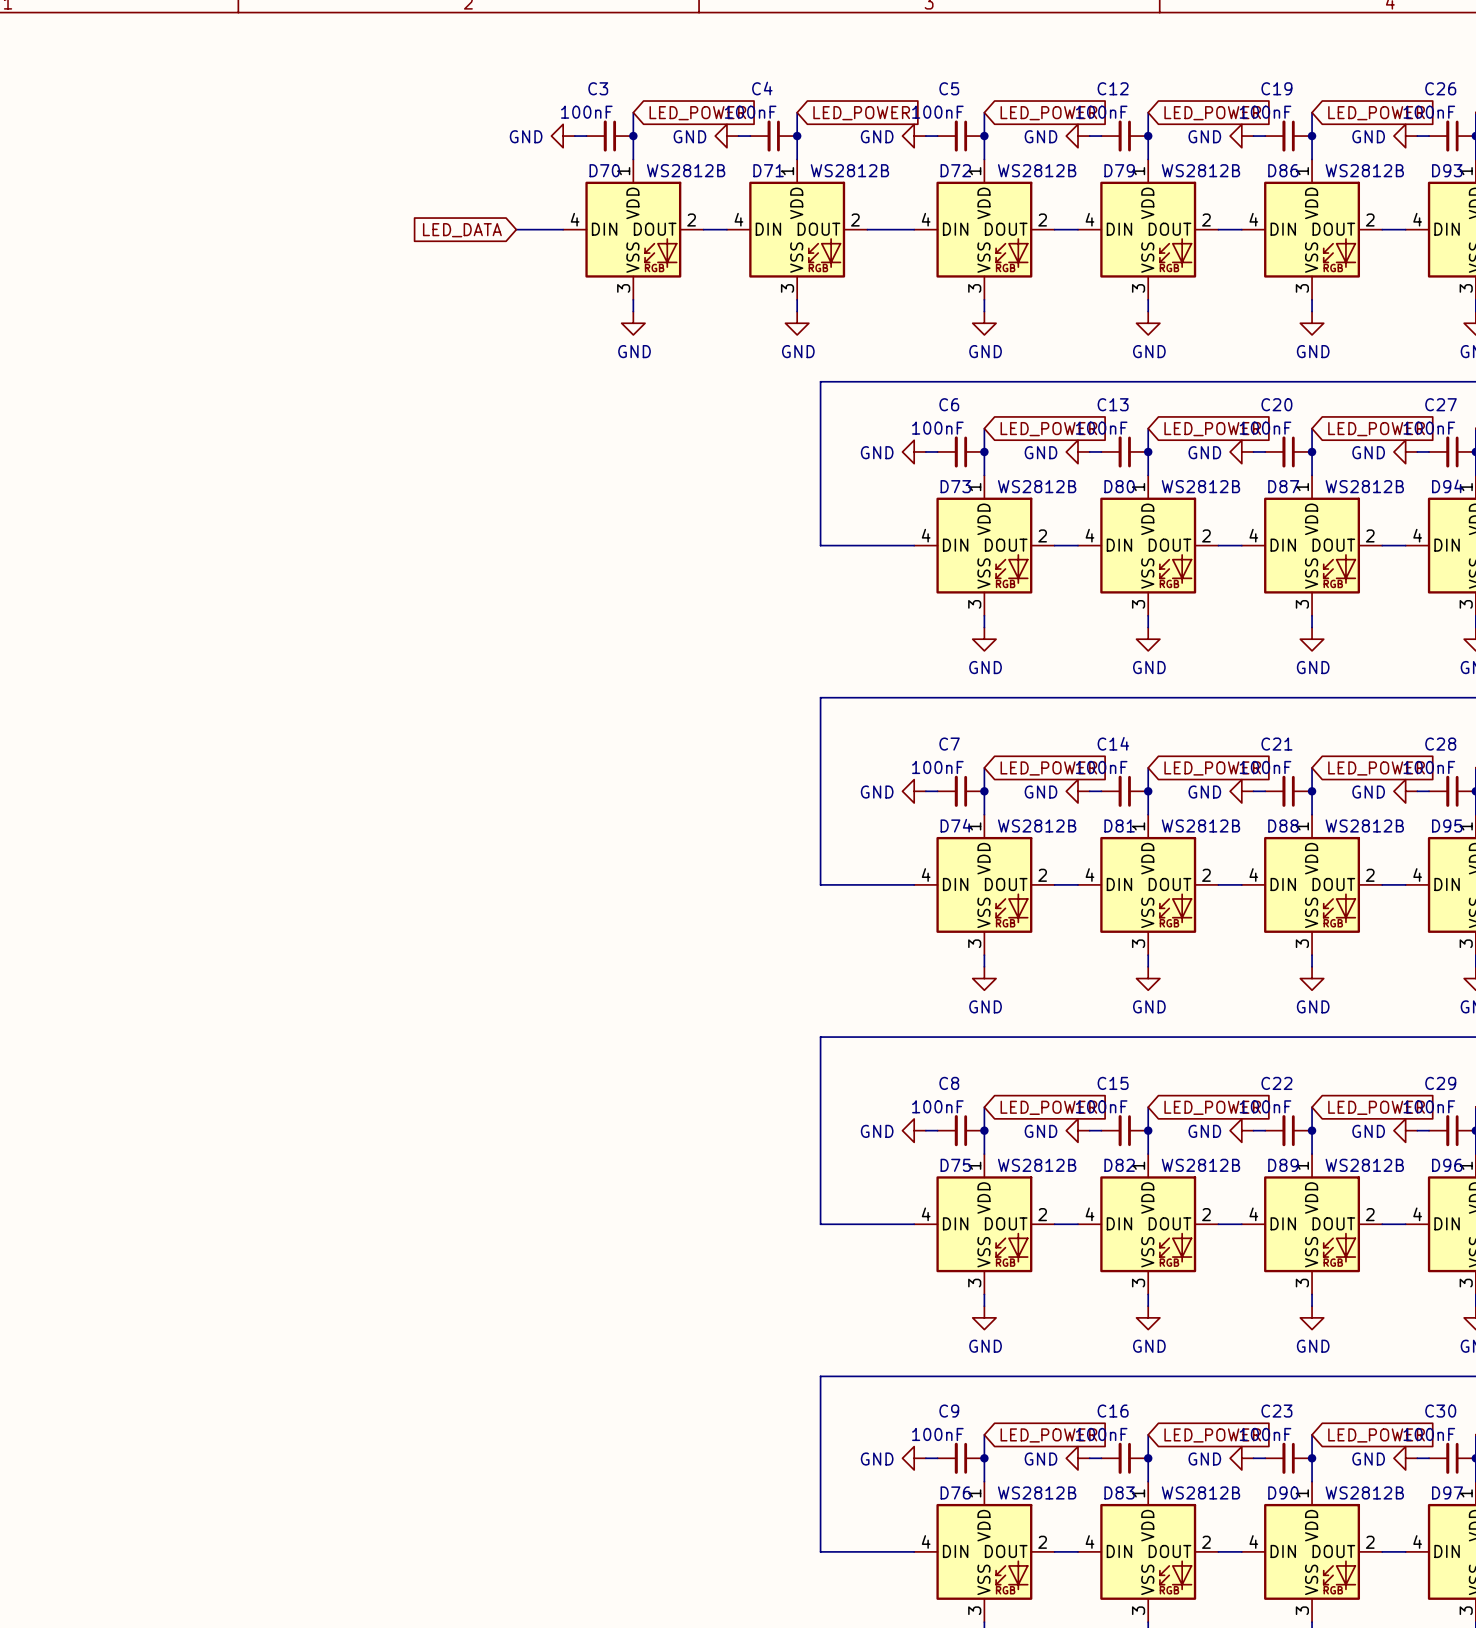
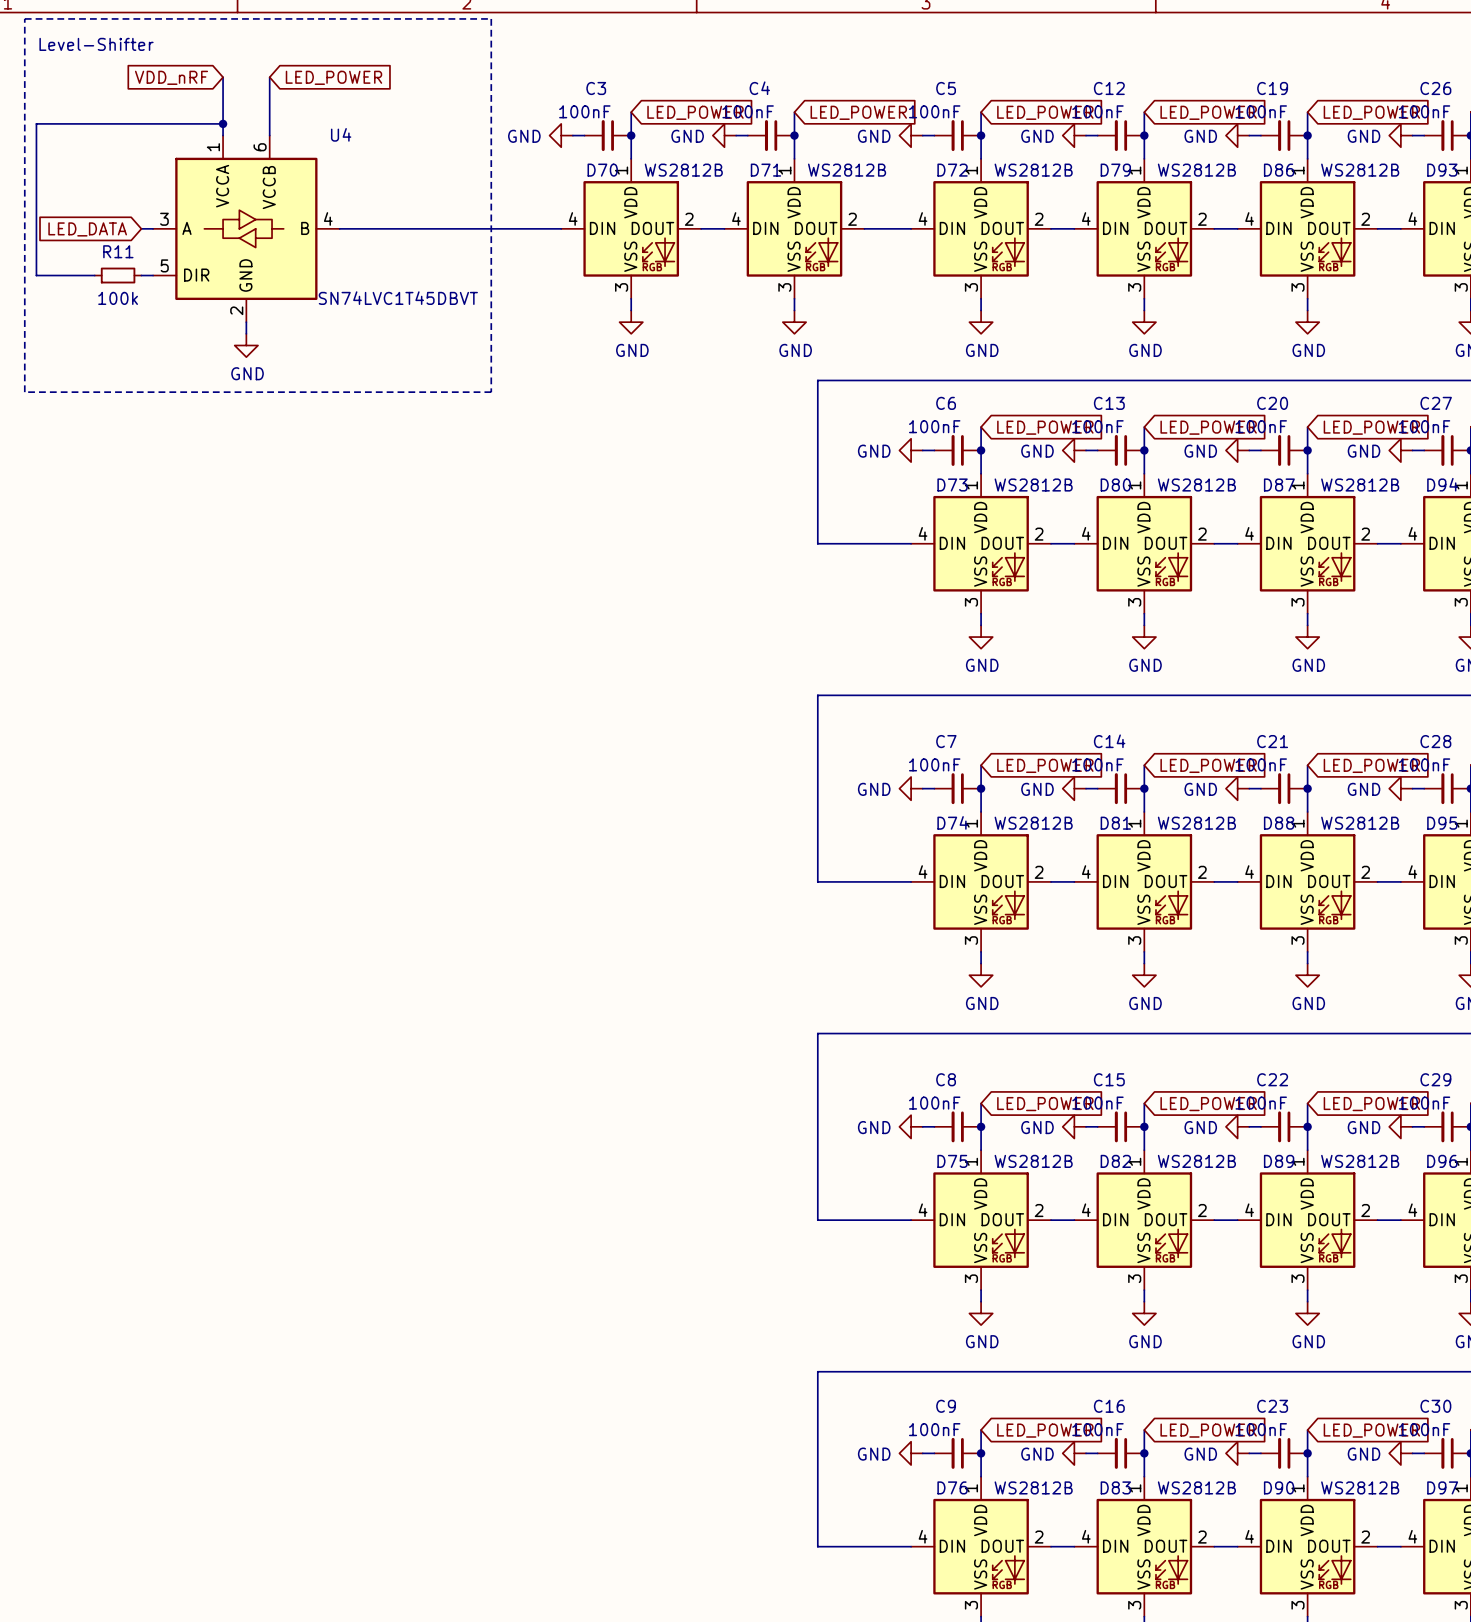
line: none -> (24, 18) (24, 392) (491, 392) (491, 18) (24, 18)
text: none -> Level-Shifter (96, 44)
wire: none -> (223, 77) (223, 135)
wire: none -> (269, 77) (269, 135)
global label: none -> VDD_nRF (171, 77)
global label: none -> LED_POWER (333, 77)
wire: none -> (223, 123) (36, 123) (36, 275) (94, 275)
junction: none -> (223, 123)
wire: none -> (141, 228) (153, 228)
U4: none -> SN74LVC1T45DBVT (246, 228)
wire: none -> (339, 228) (514, 228)
global label: none -> LED_DATA (87, 229)
global label: LED_DATA (462, 230) -> none
R11: none -> 100k (118, 275)
wire: none -> (141, 275) (153, 275)
wire: none -> (246, 322) (246, 333)
power symbol: none -> GND (246, 345)

